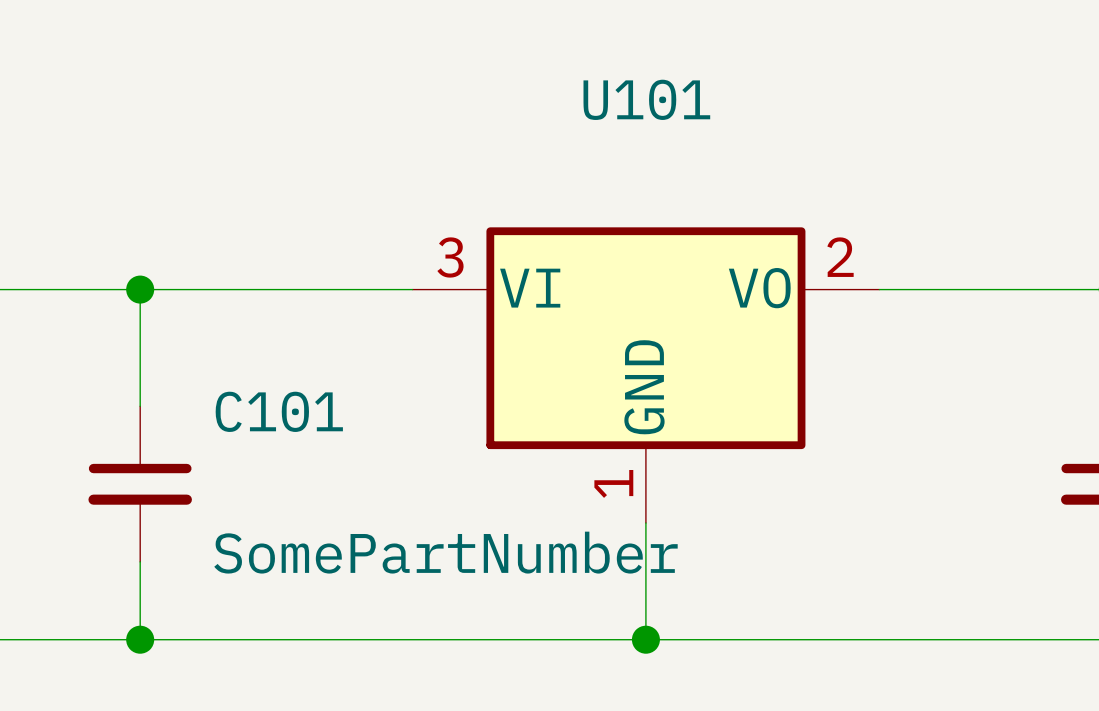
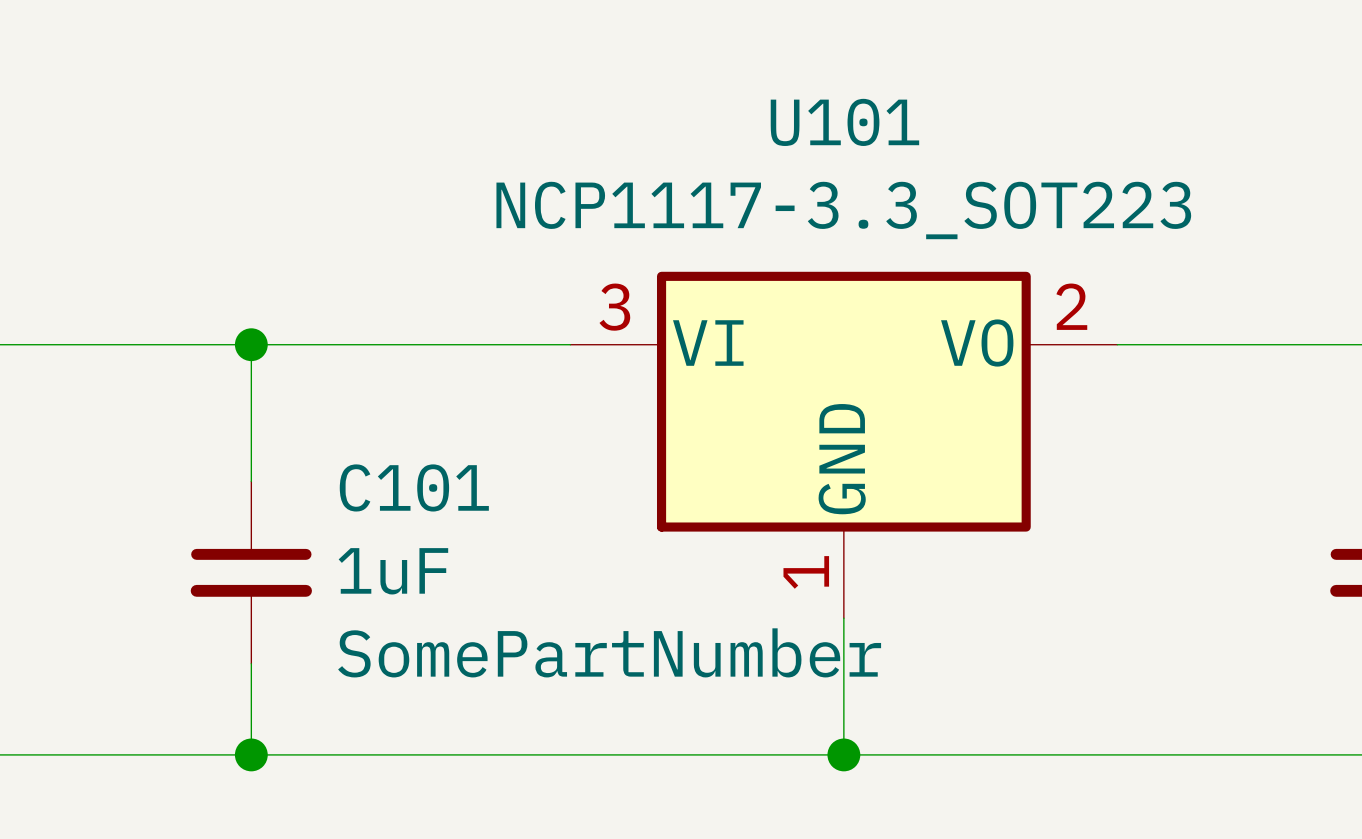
U101 value: none -> NCP1117-3.3_SOT223 (843, 210)
C101 value: none -> 1uF (393, 571)

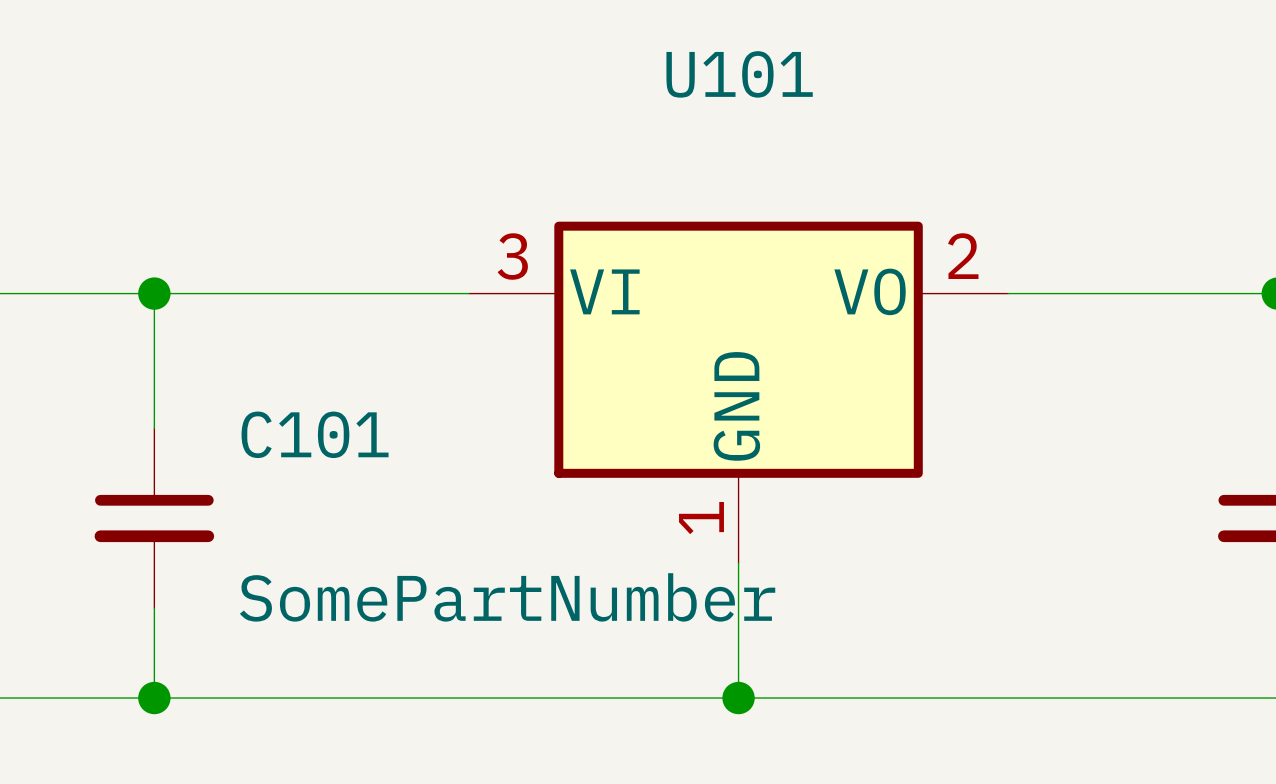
U101 value: NCP1117-3.3_SOT223 (843, 210) -> none
C101 value: 1uF (393, 571) -> none

